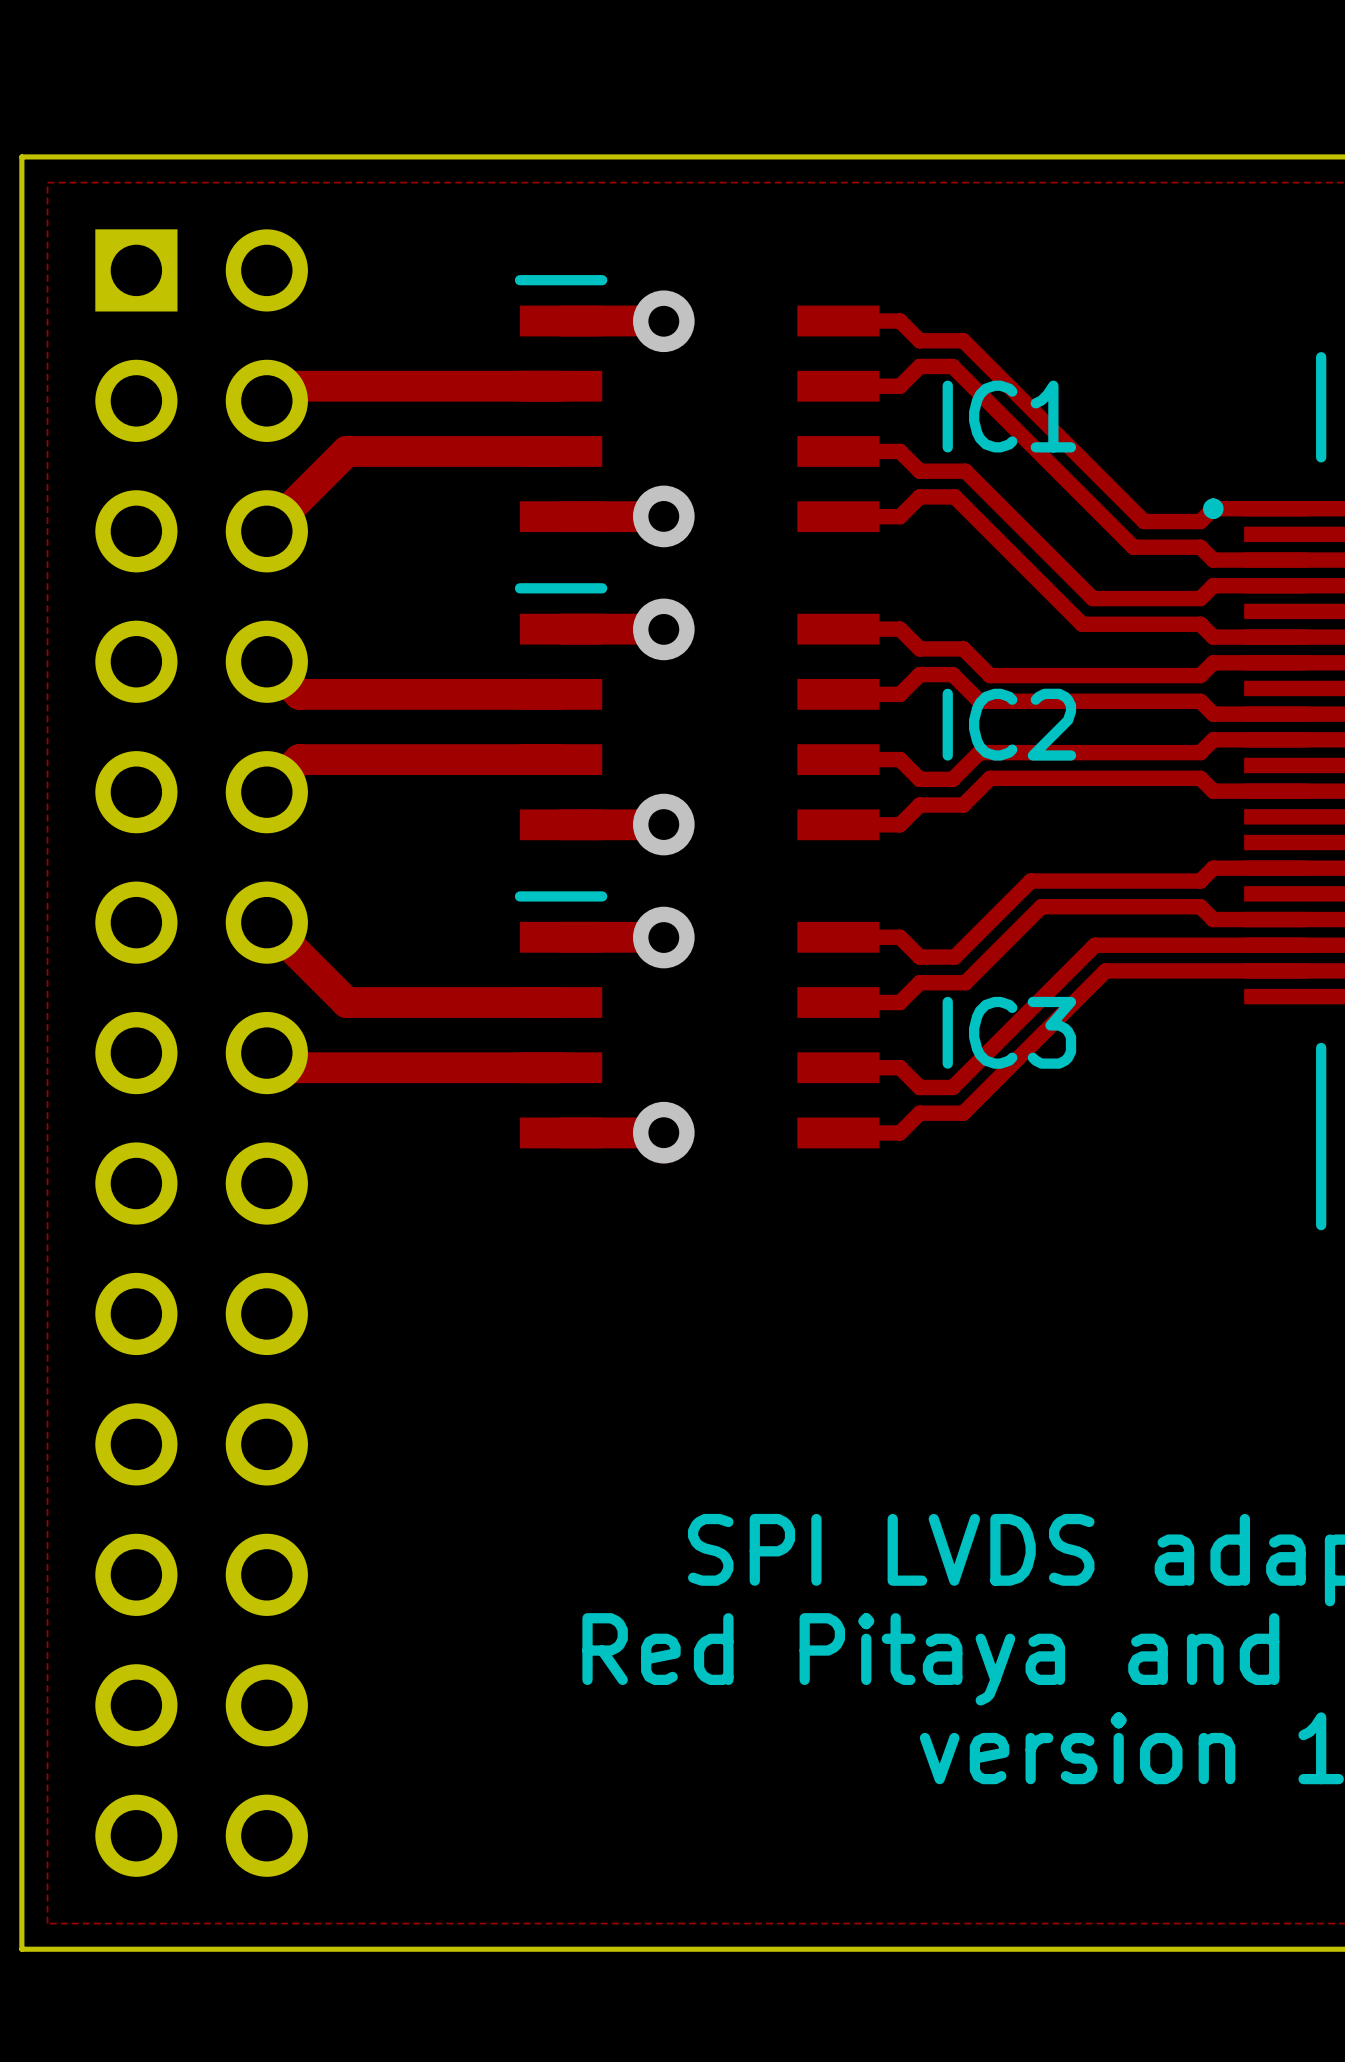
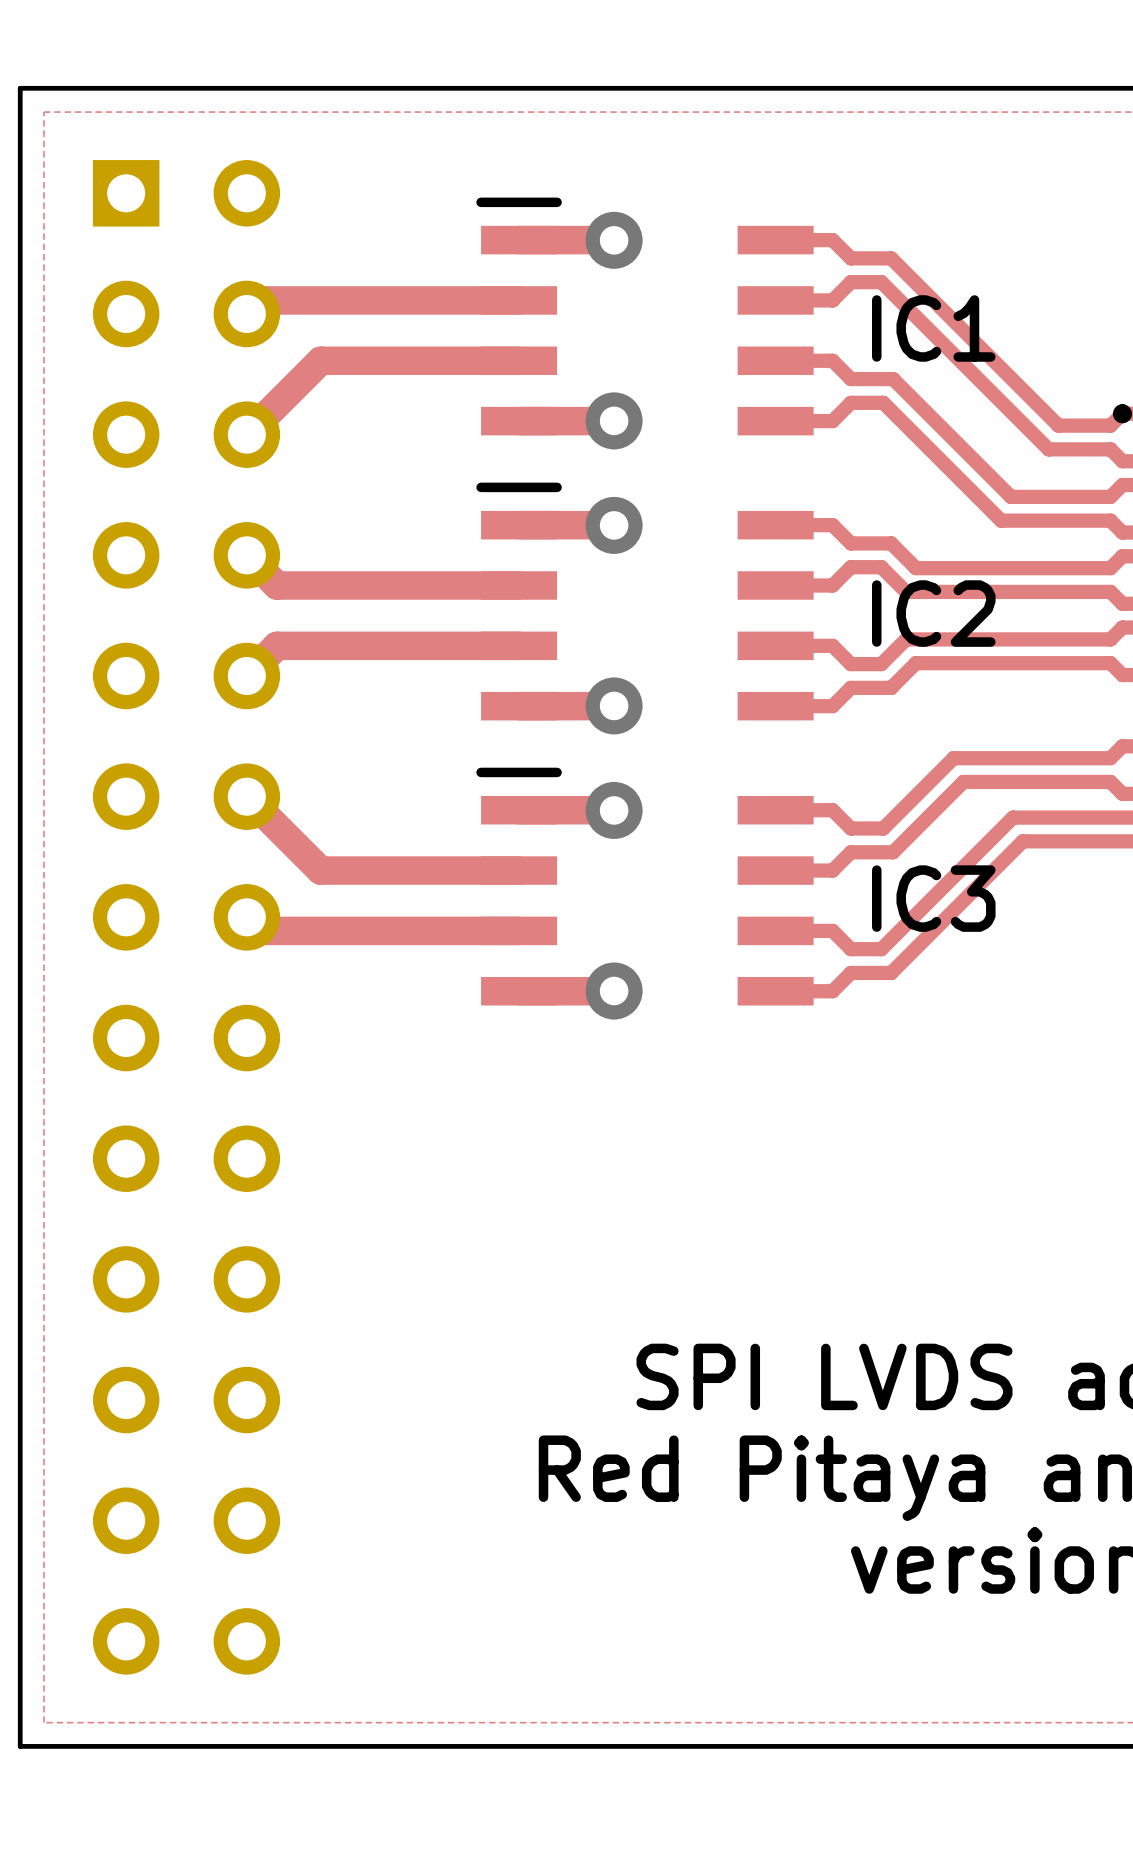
part footprint: [95, 229, 308, 1877] -> [92, 160, 281, 1675]

